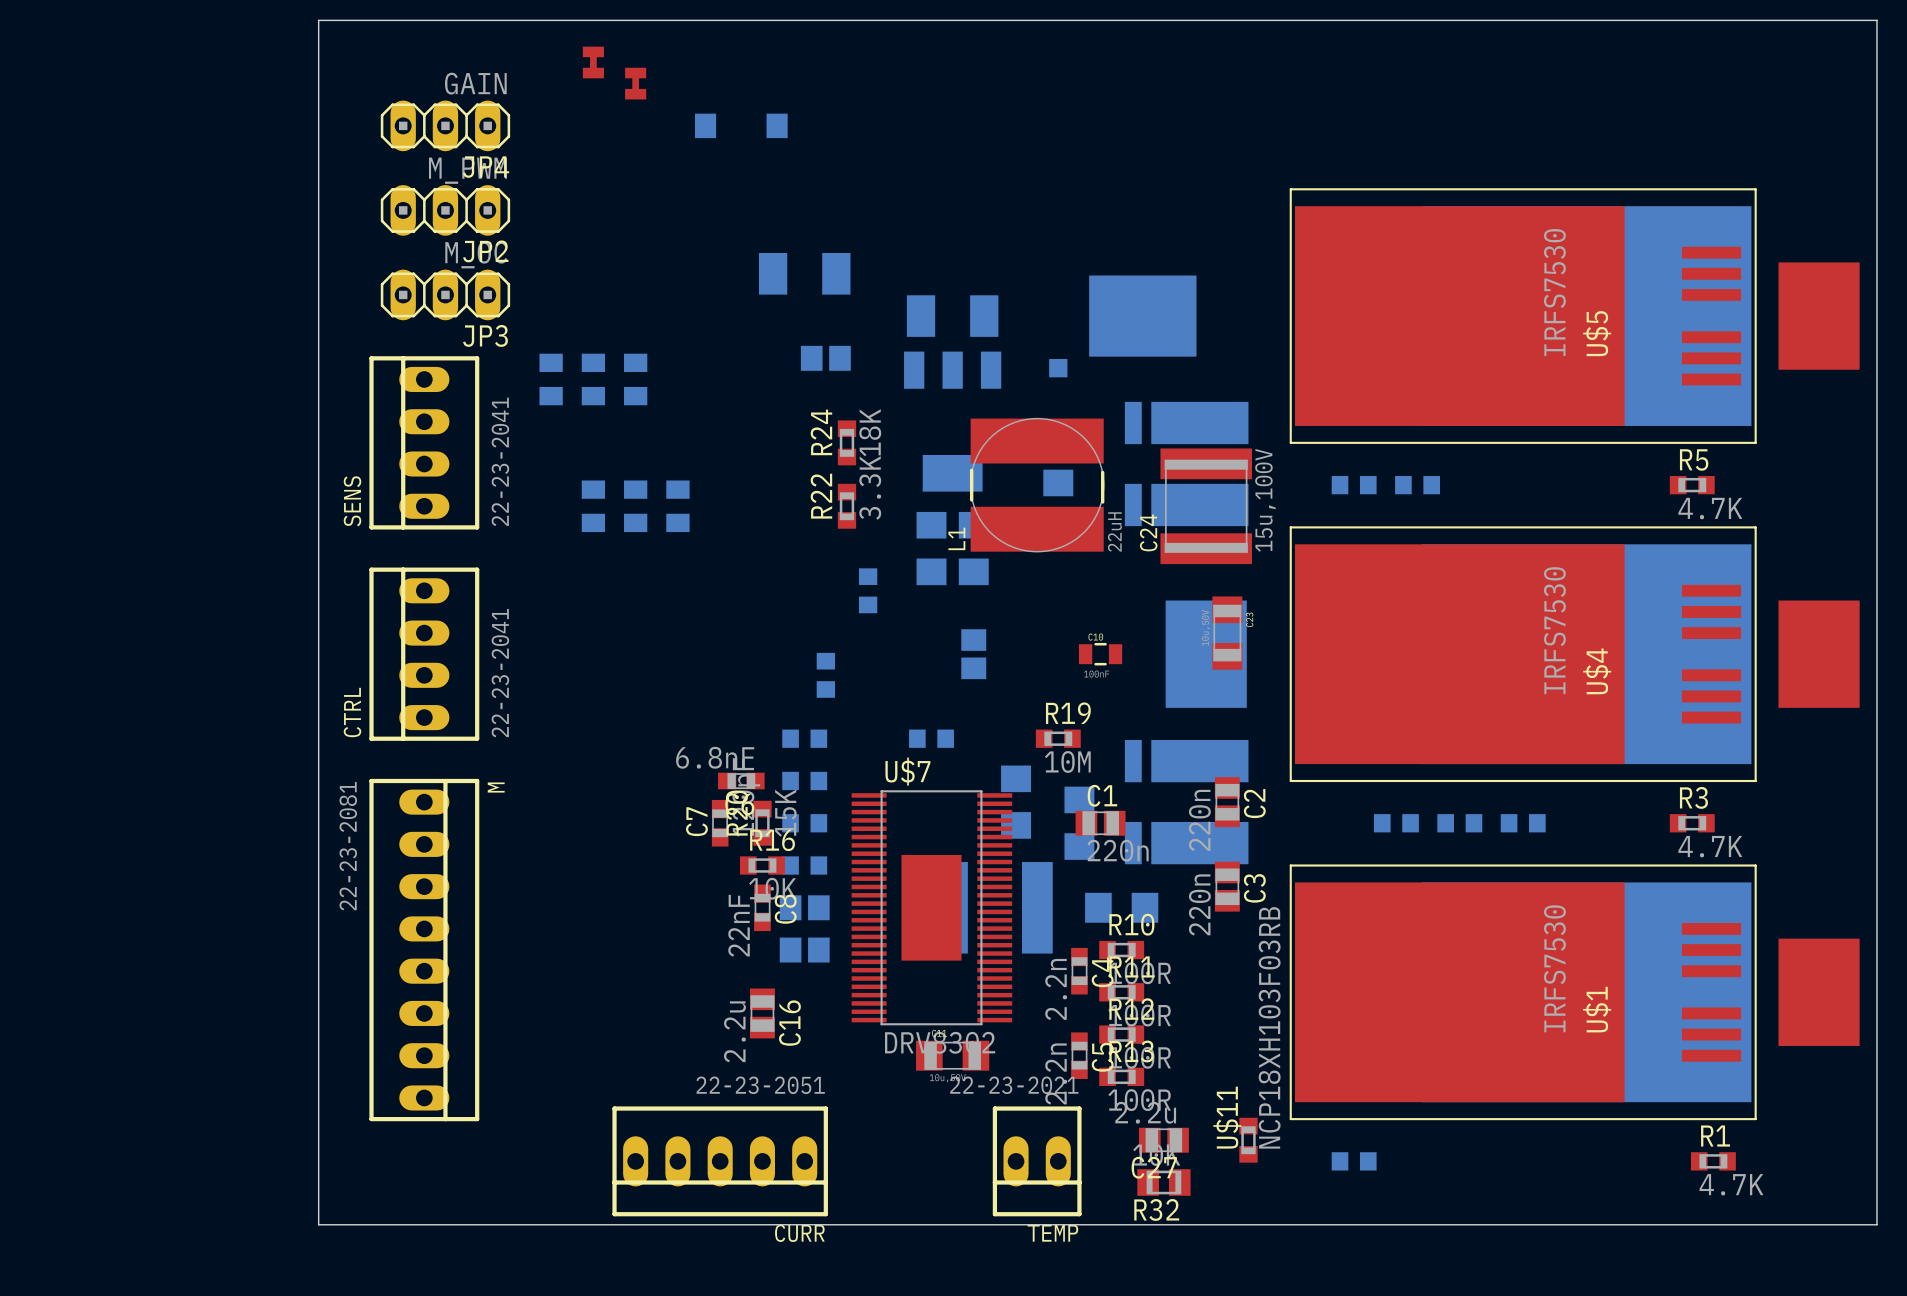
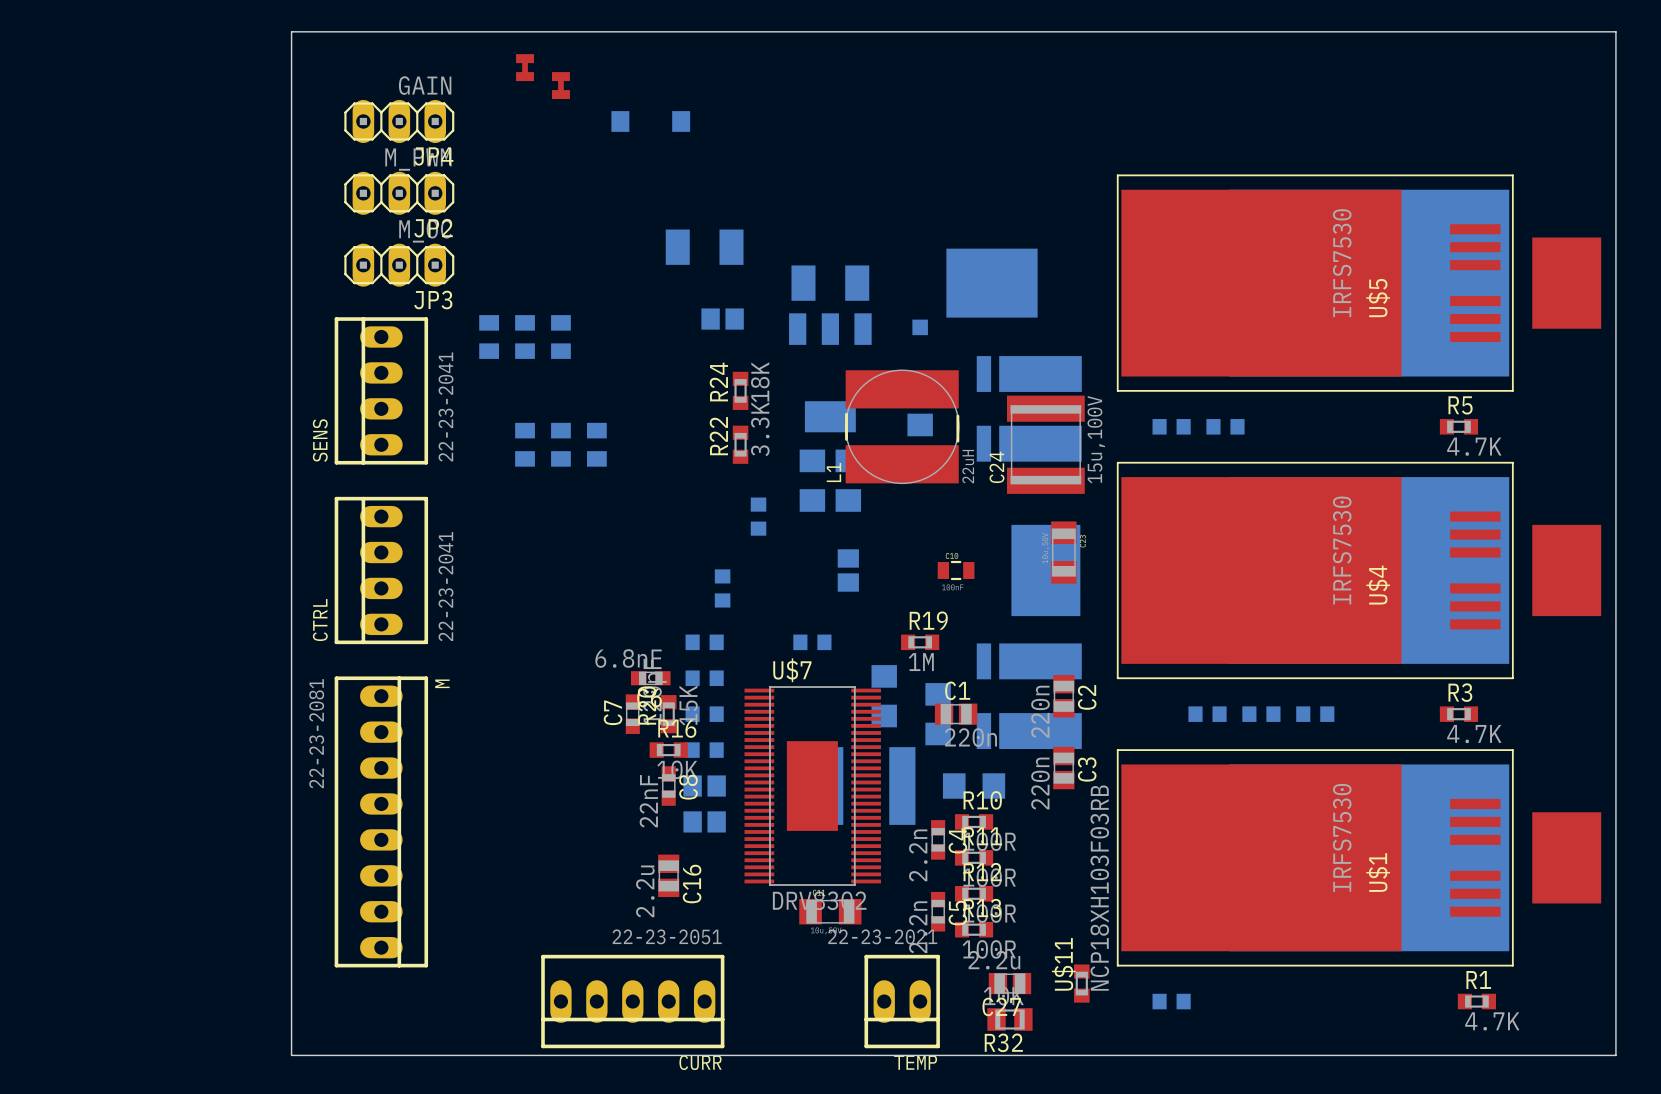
R19 value: 10M (1067, 761) -> 1M (921, 662)

